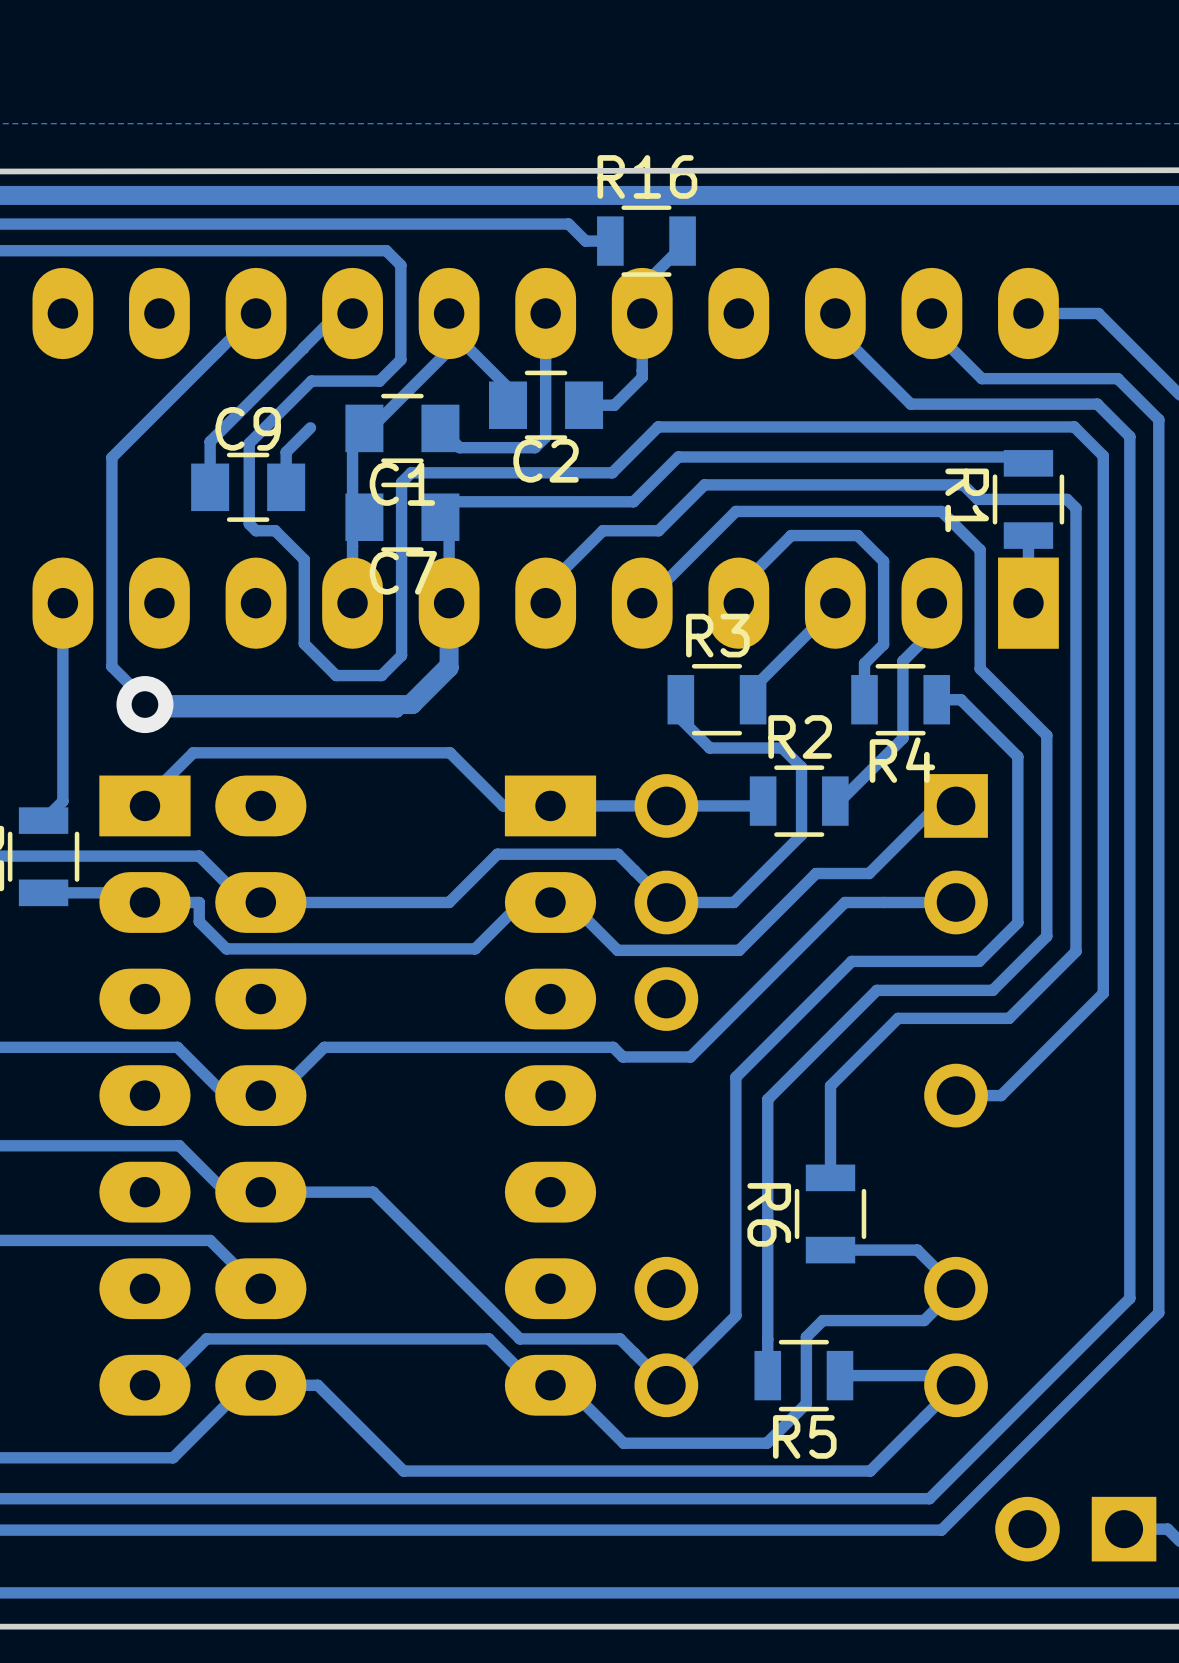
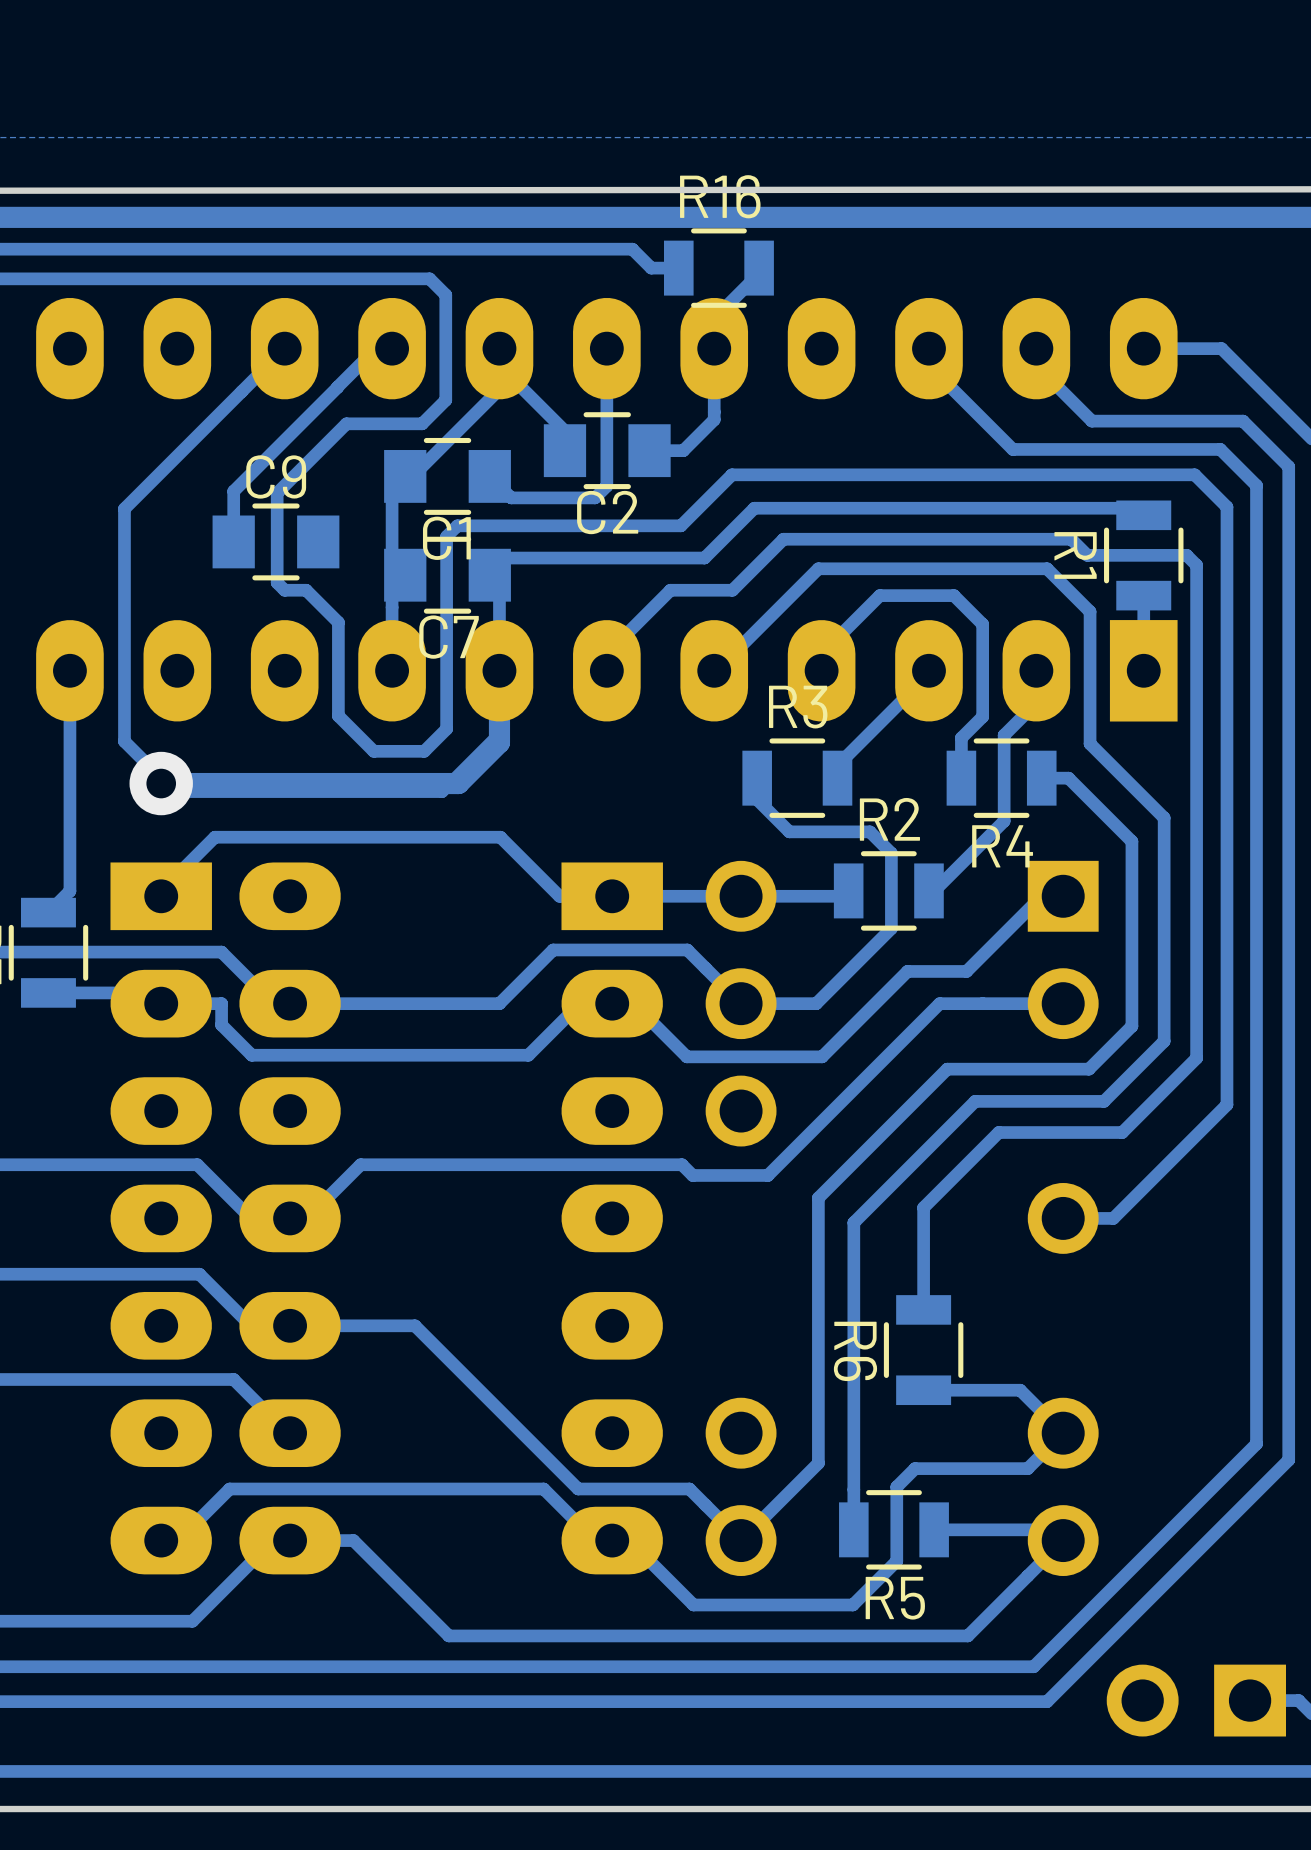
track: (310, 427) (286, 452) (286, 487) -> none

